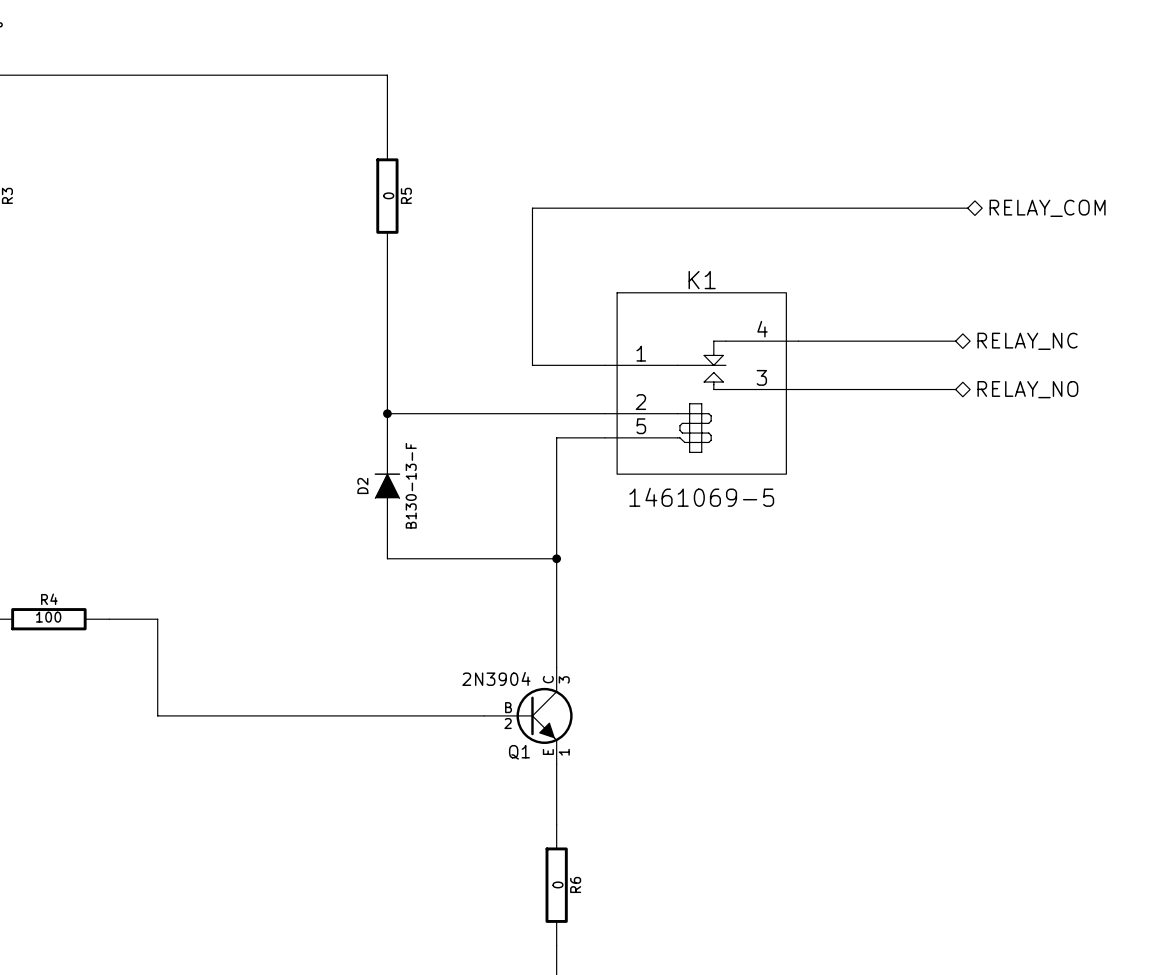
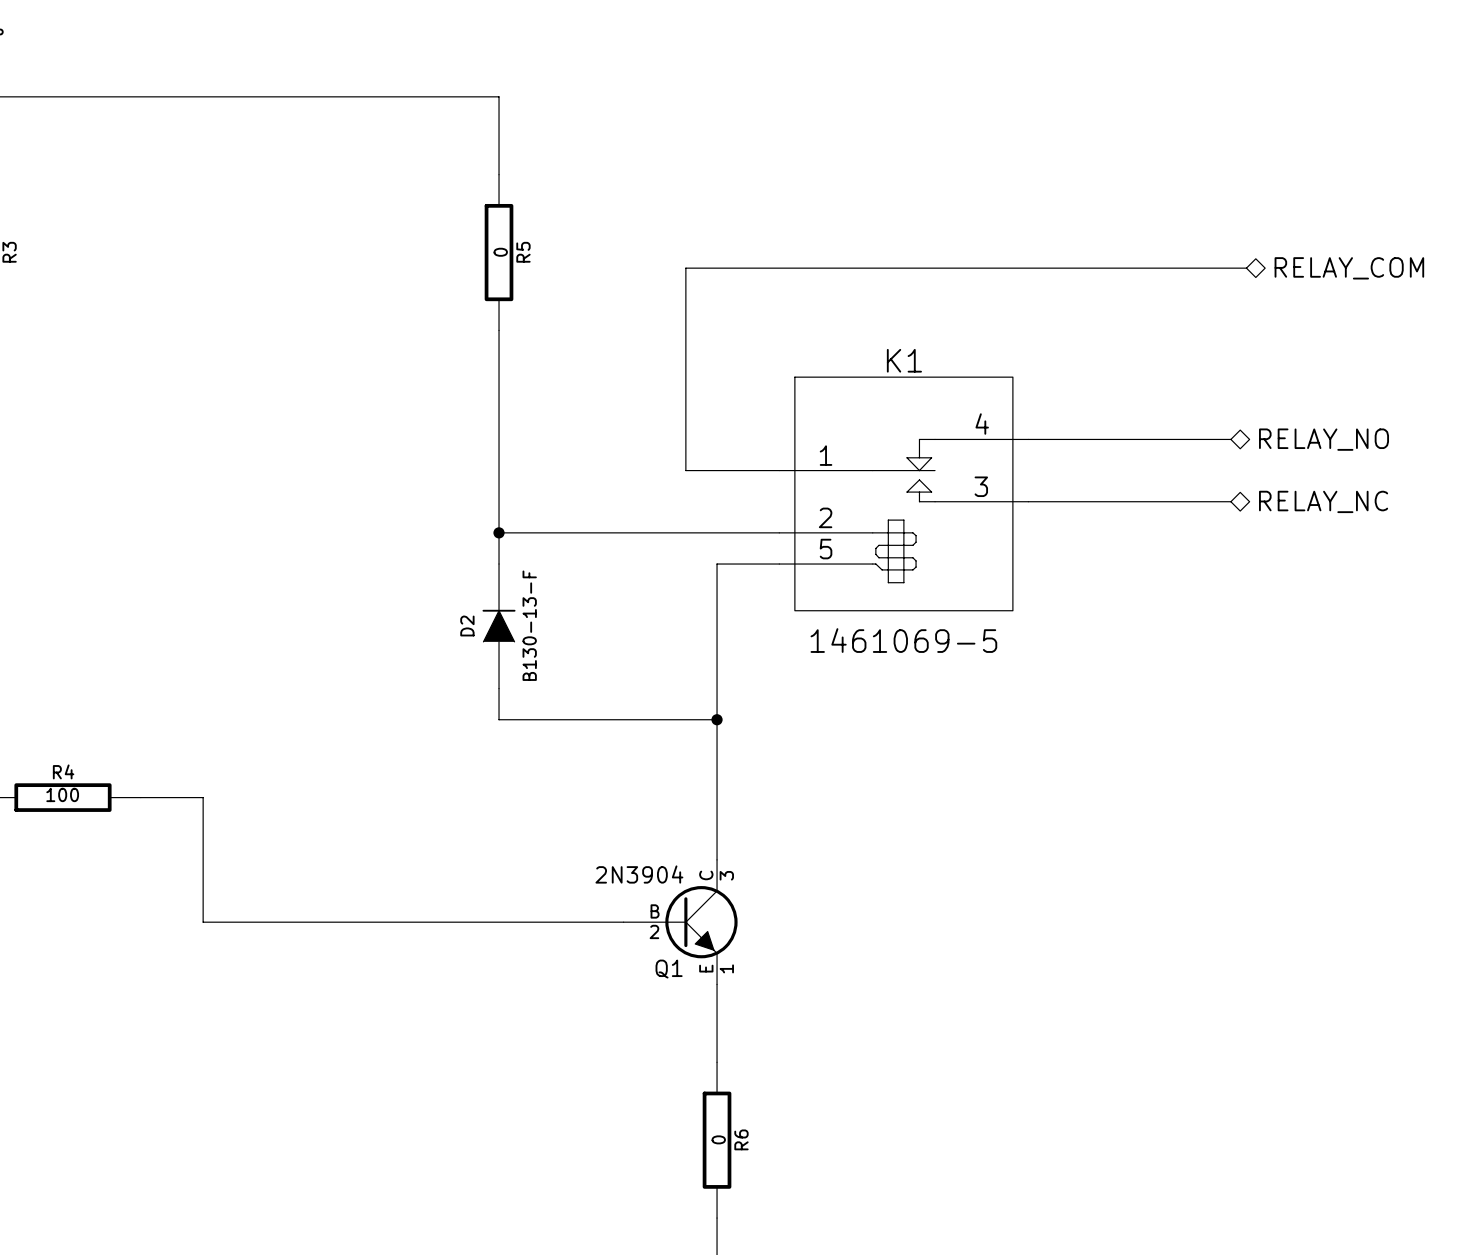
hierarchical label: RELAY_NC (1027, 341) -> RELAY_NO (1324, 439)
hierarchical label: RELAY_NO (1027, 389) -> RELAY_NC (1323, 501)

